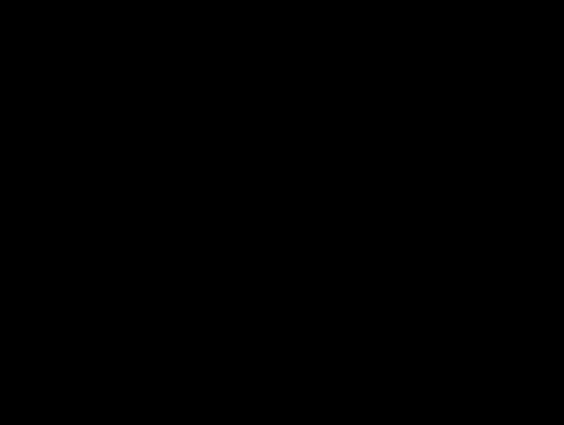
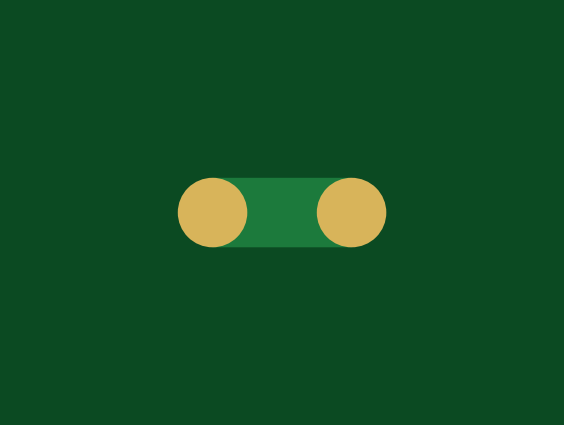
part: none -> (282, 212)

